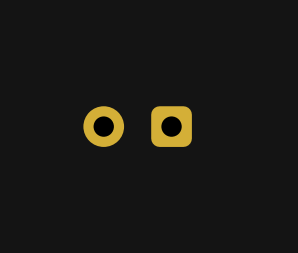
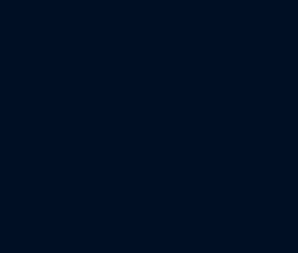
part: (137, 126) -> none

